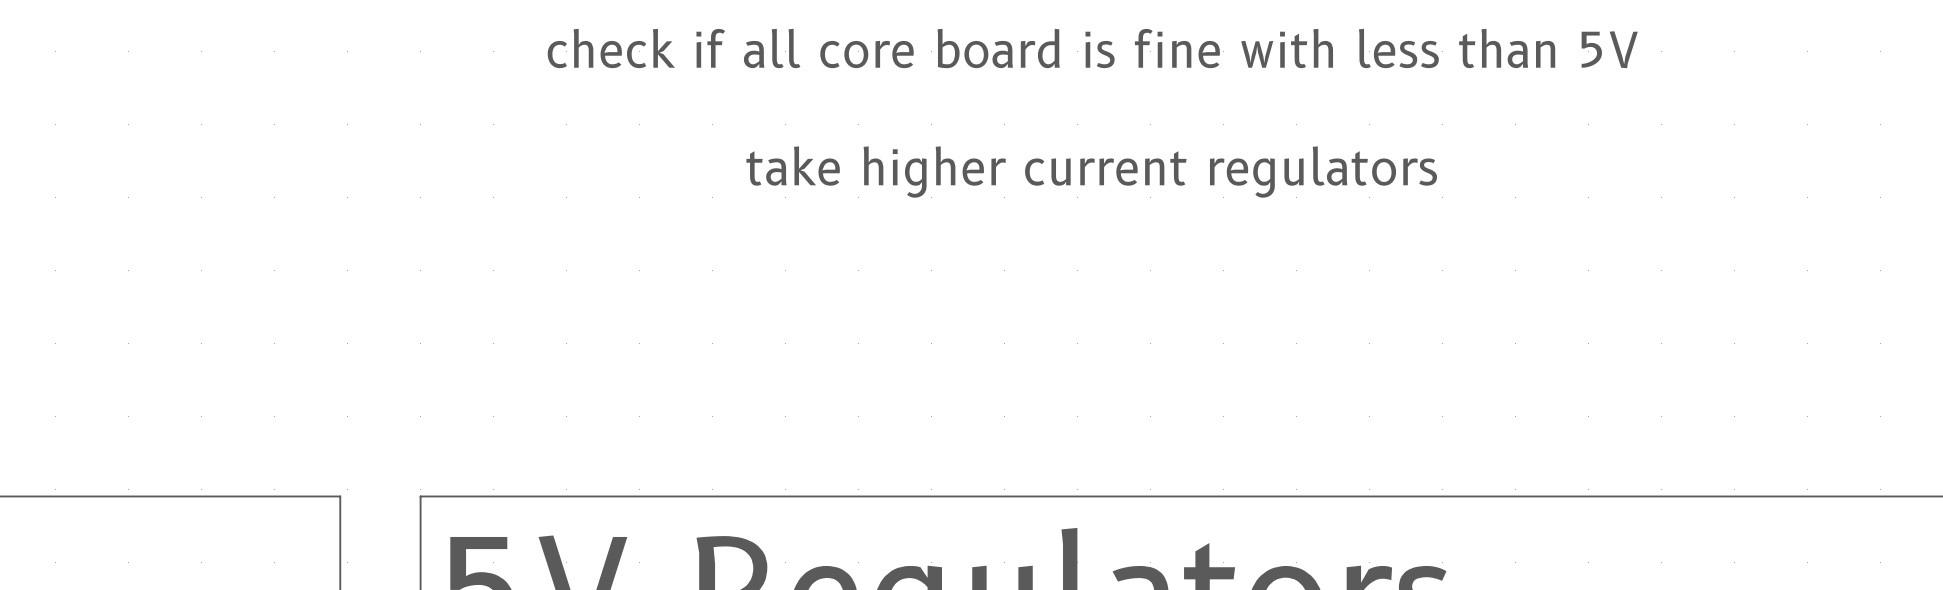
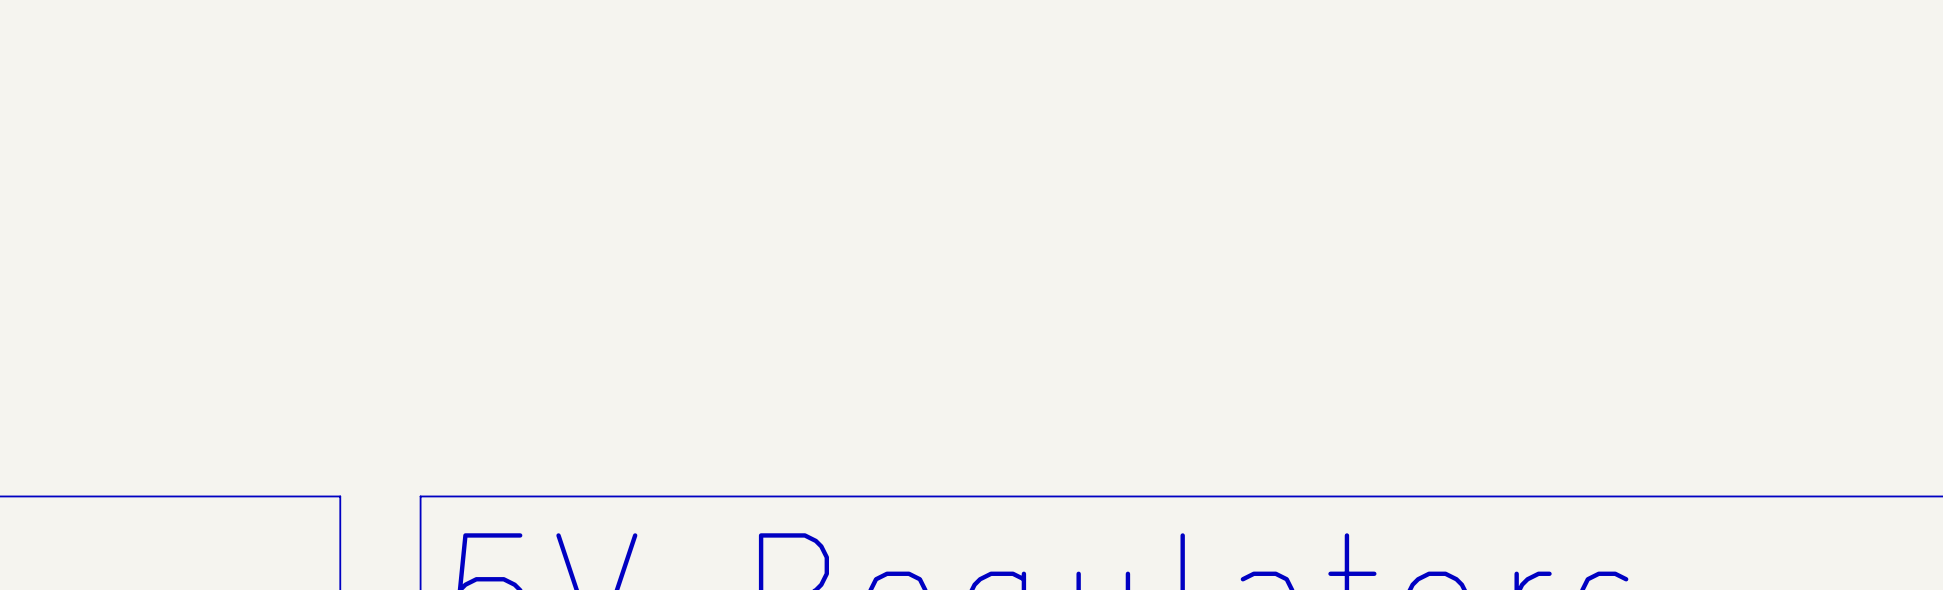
text: check if all core board is fine with less than 5V (1092, 48) -> none
text: take higher current regulators (1091, 172) -> none

